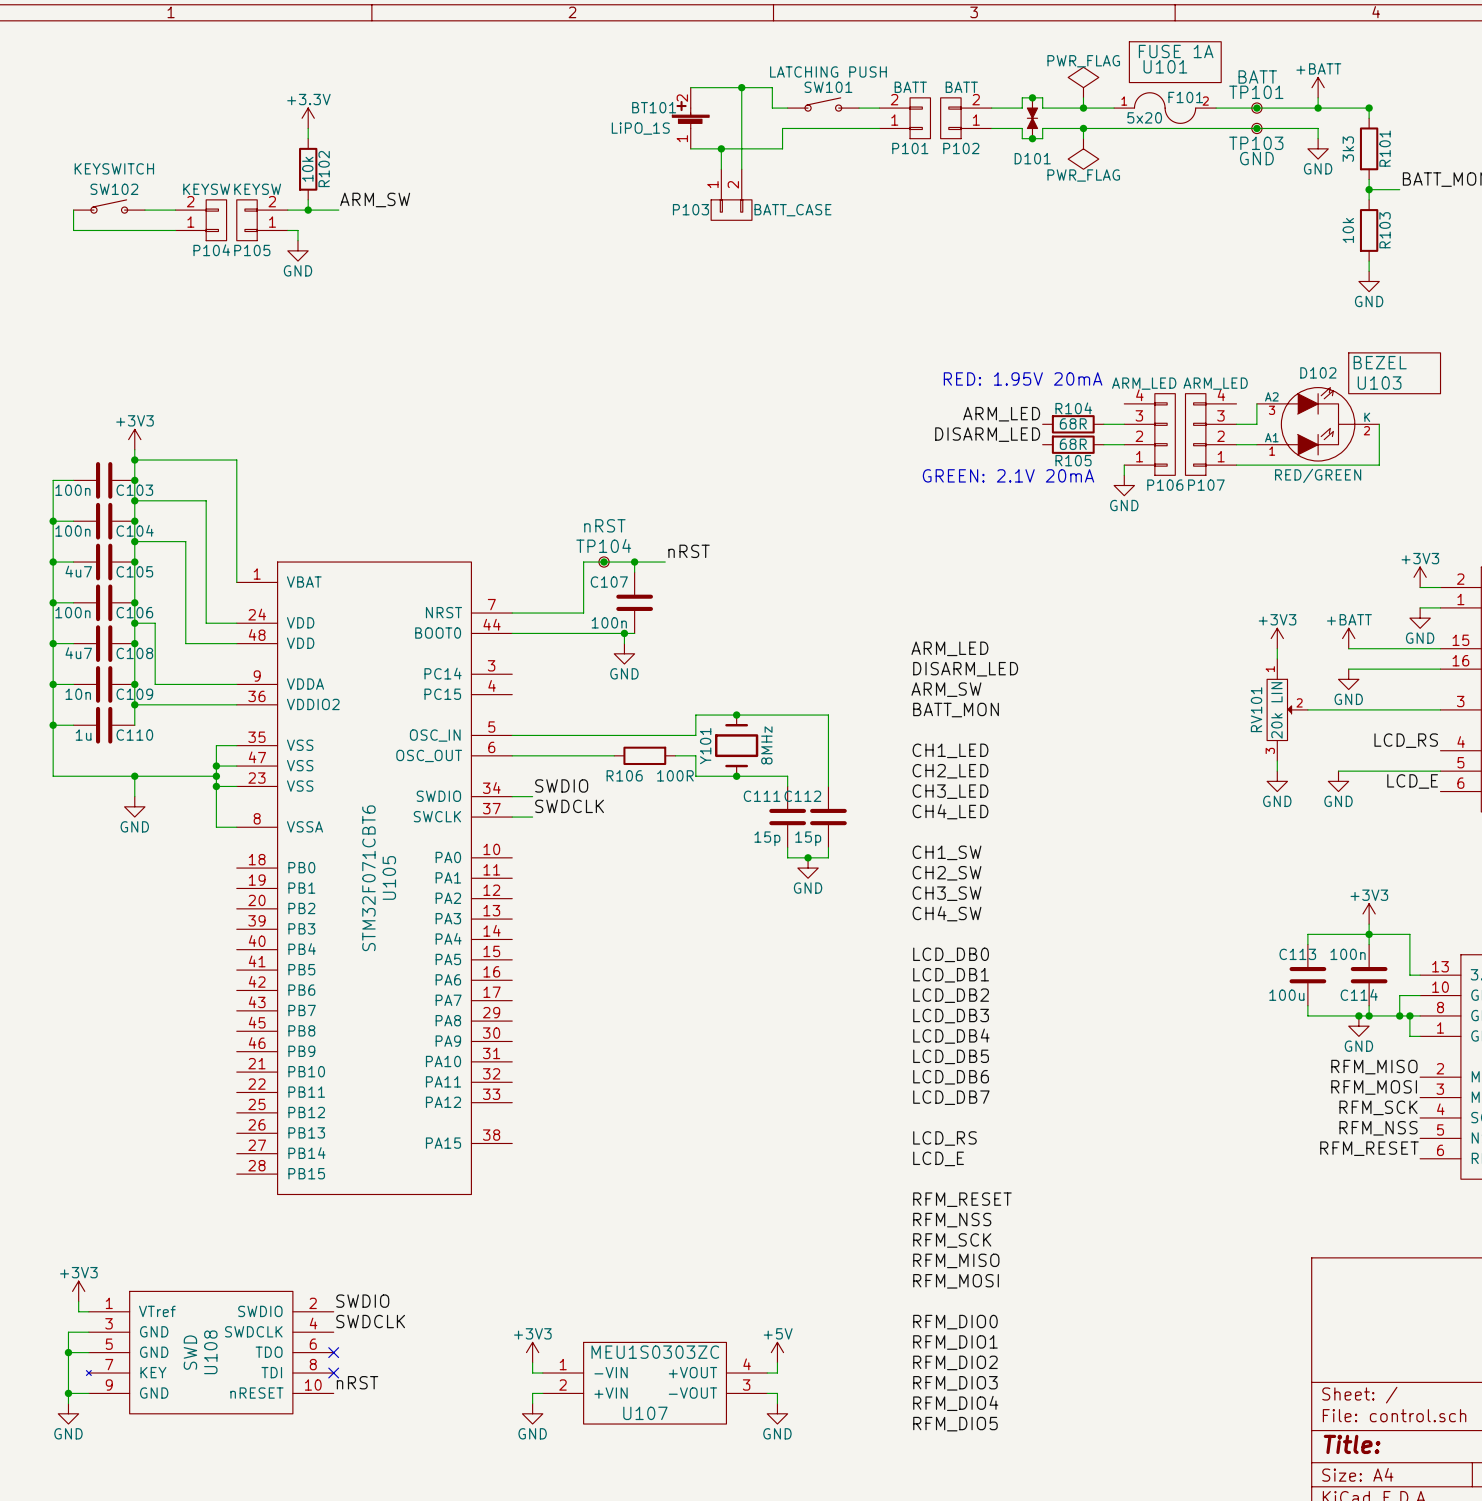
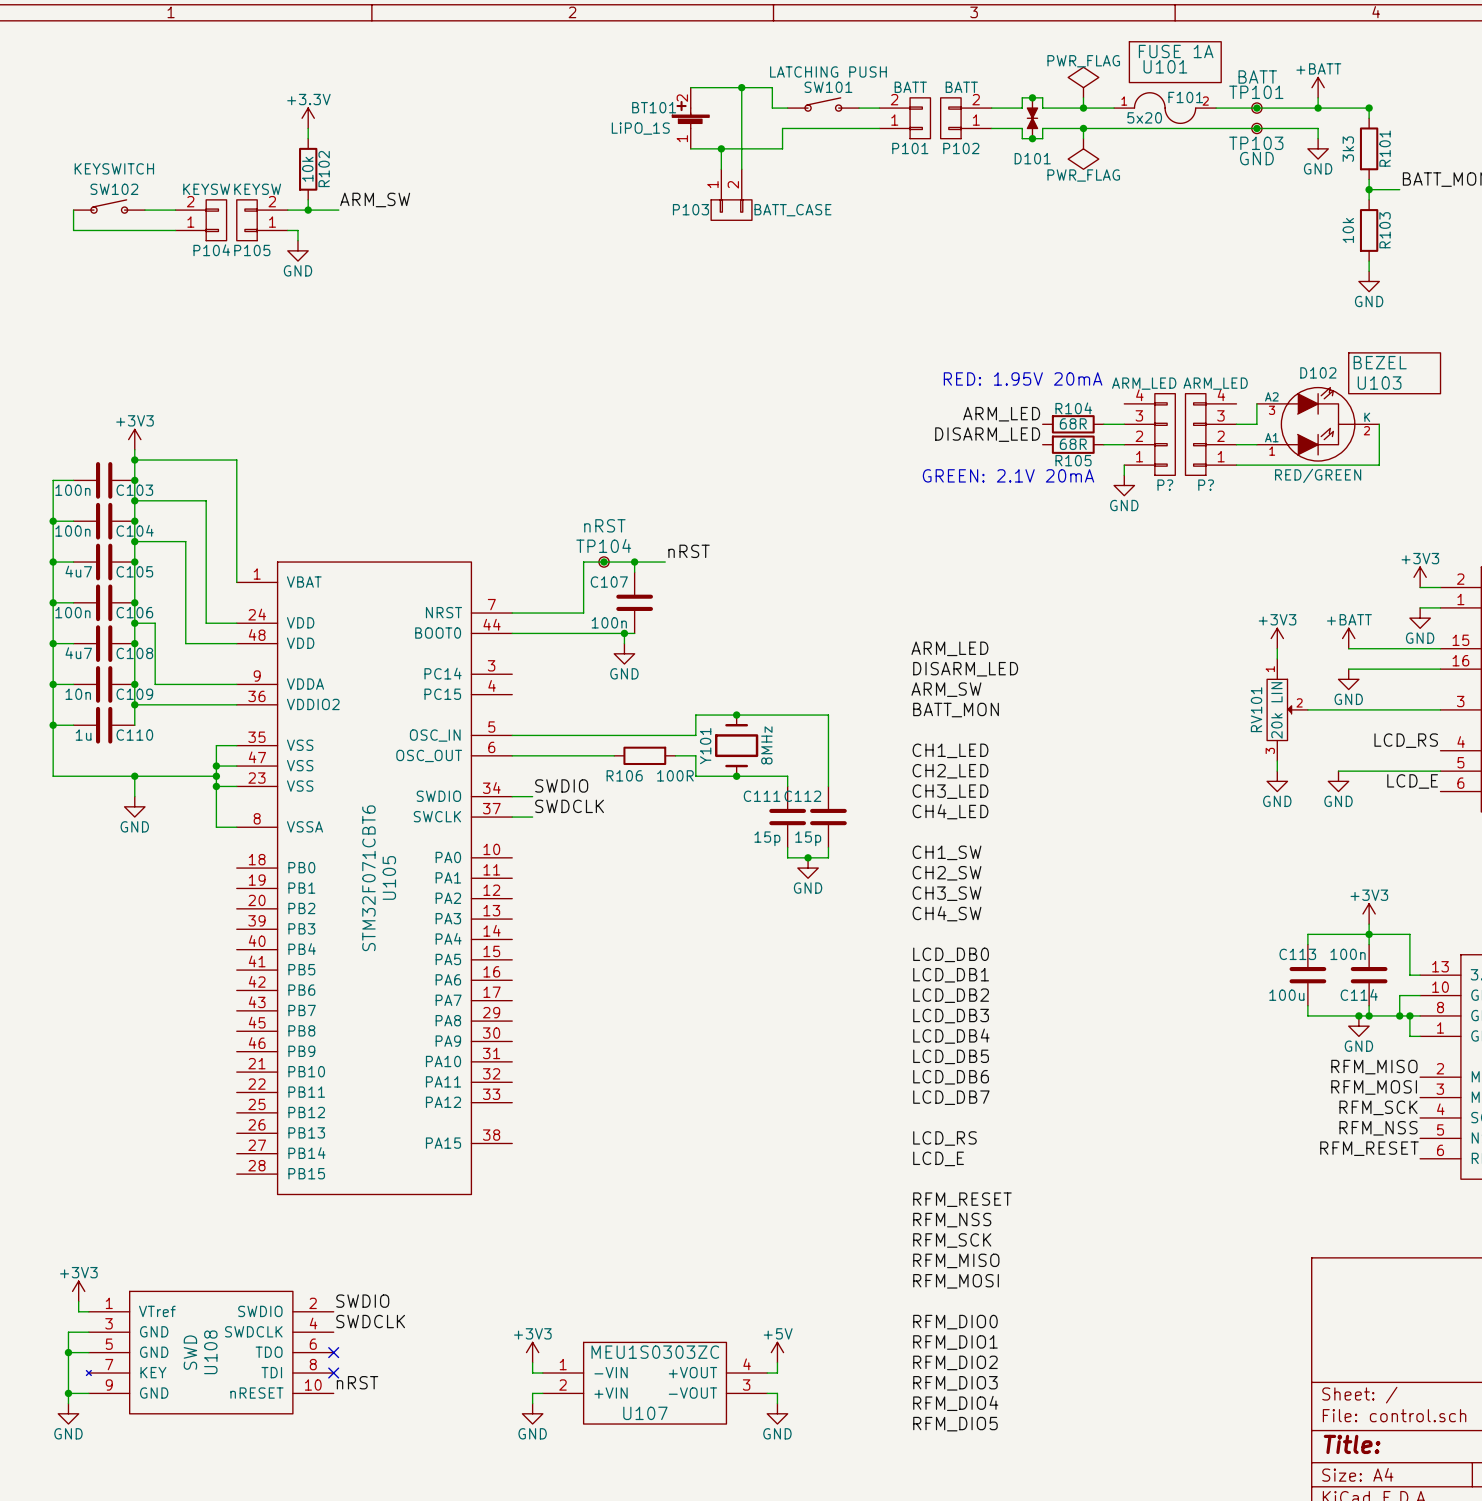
P106 name: P106 (1165, 485) -> P? (1165, 485)
P107 name: P107 (1206, 485) -> P? (1206, 485)

